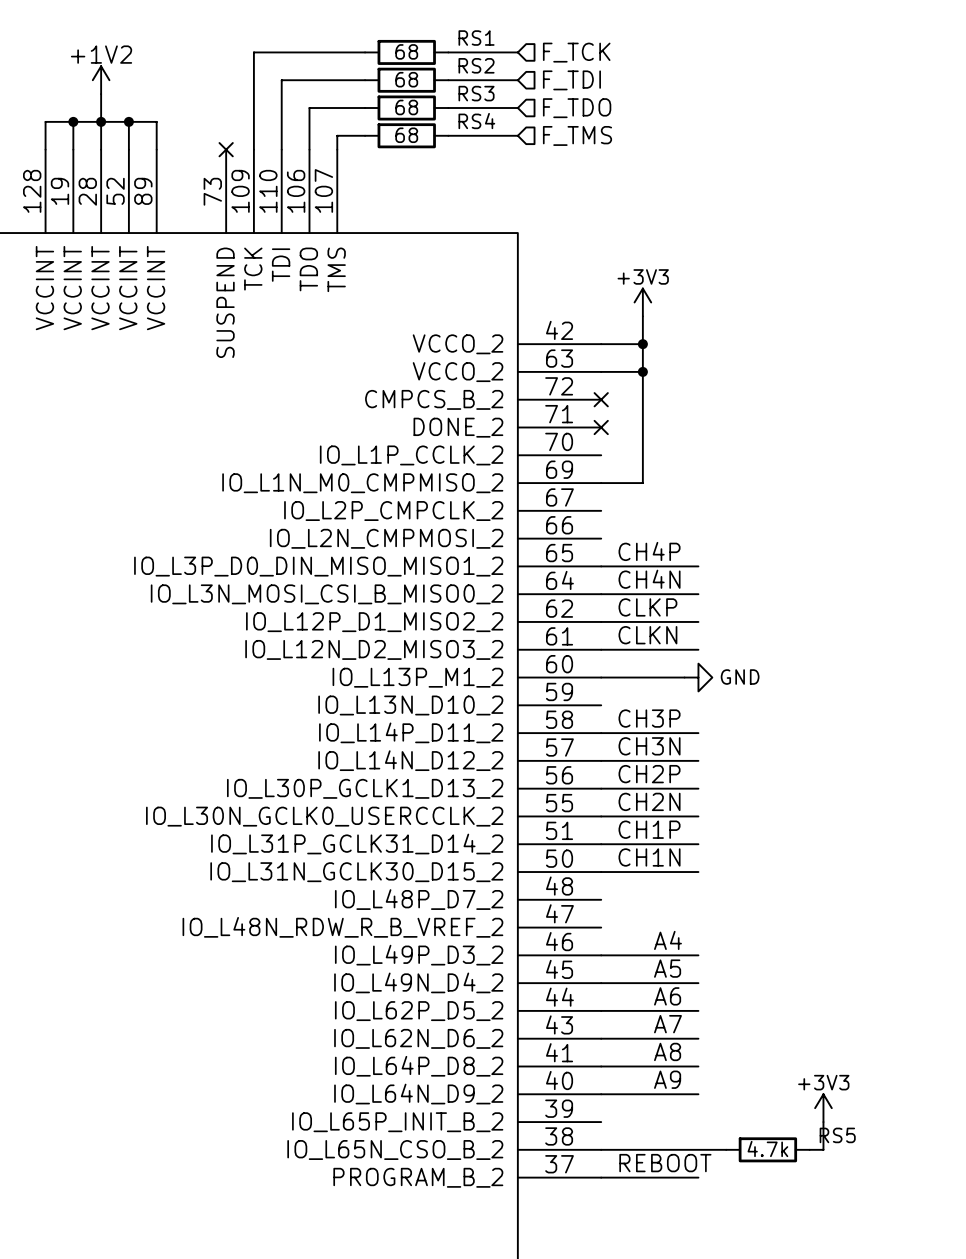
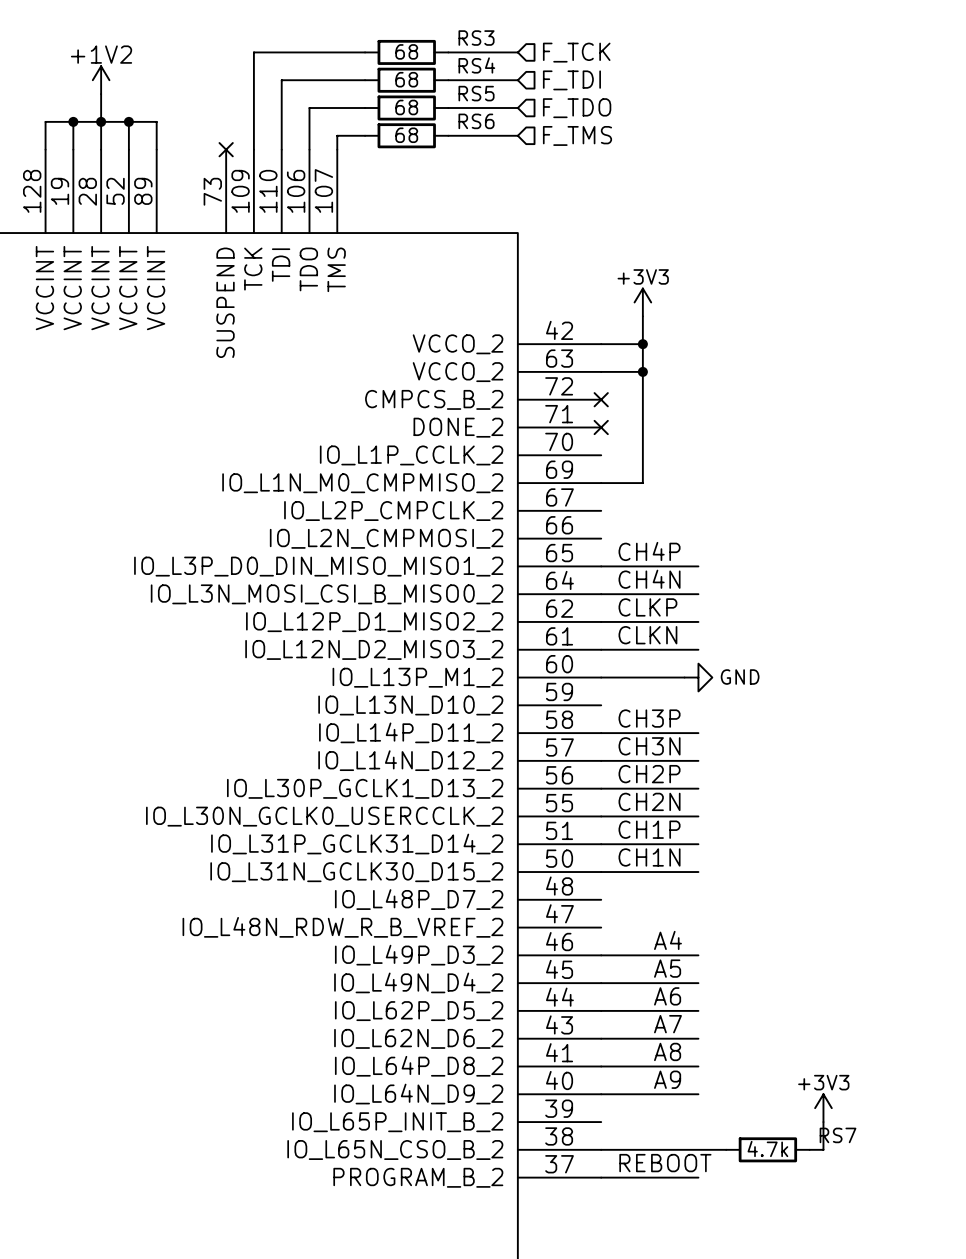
RS1 name: RS1 (476, 38) -> RS3 (476, 38)
RS2 name: RS2 (476, 65) -> RS4 (476, 65)
RS3 name: RS3 (476, 93) -> RS5 (476, 93)
RS4 name: RS4 (476, 121) -> RS6 (476, 121)
RS5 name: RS5 (837, 1135) -> RS7 (838, 1135)

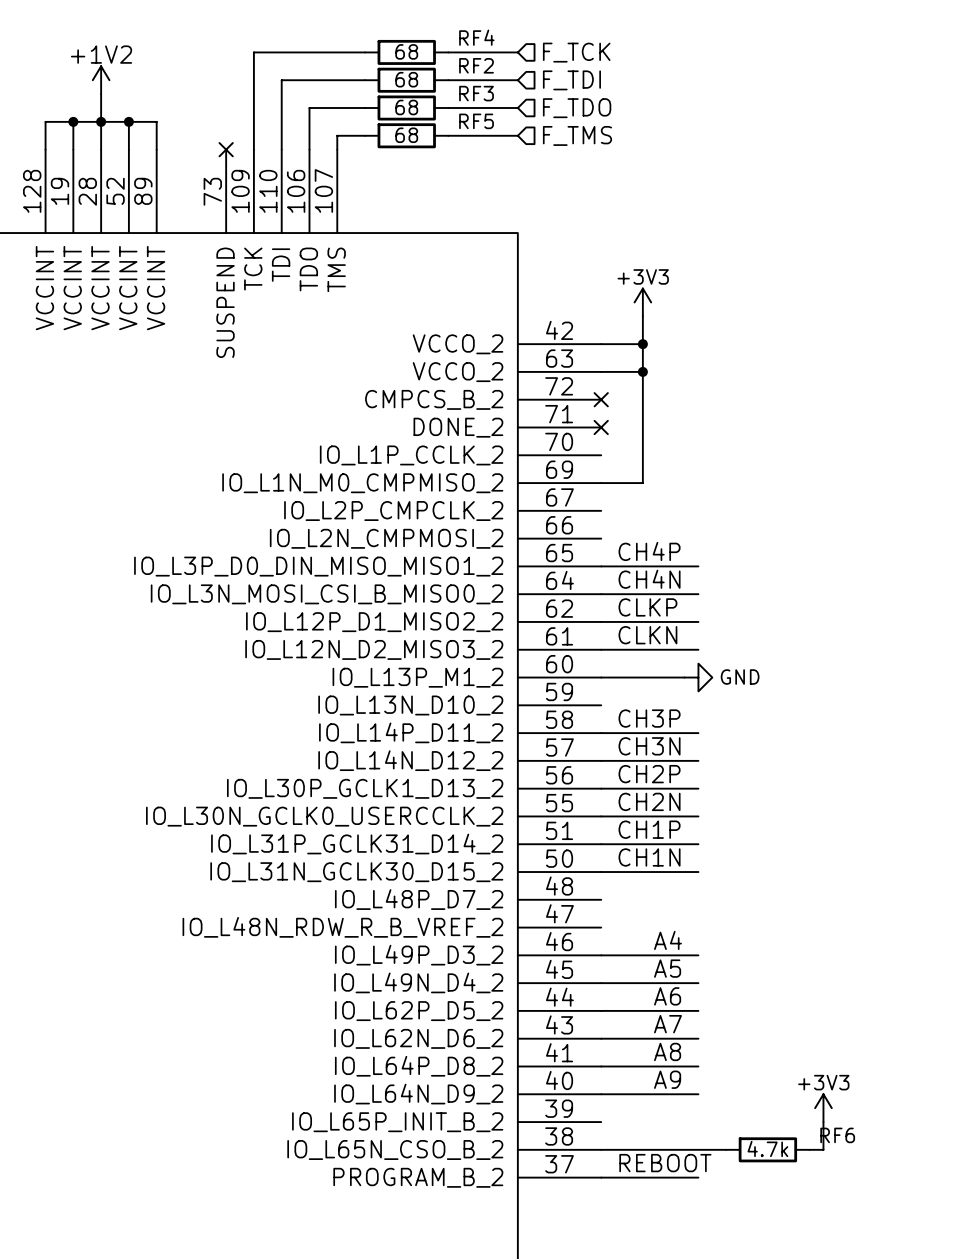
RS3 name: RS3 (476, 38) -> RF4 (476, 37)
RS4 name: RS4 (476, 65) -> RF2 (476, 65)
RS5 name: RS5 (476, 93) -> RF3 (476, 93)
RS6 name: RS6 (476, 121) -> RF5 (476, 121)
RS7 name: RS7 (838, 1135) -> RF6 (837, 1135)

